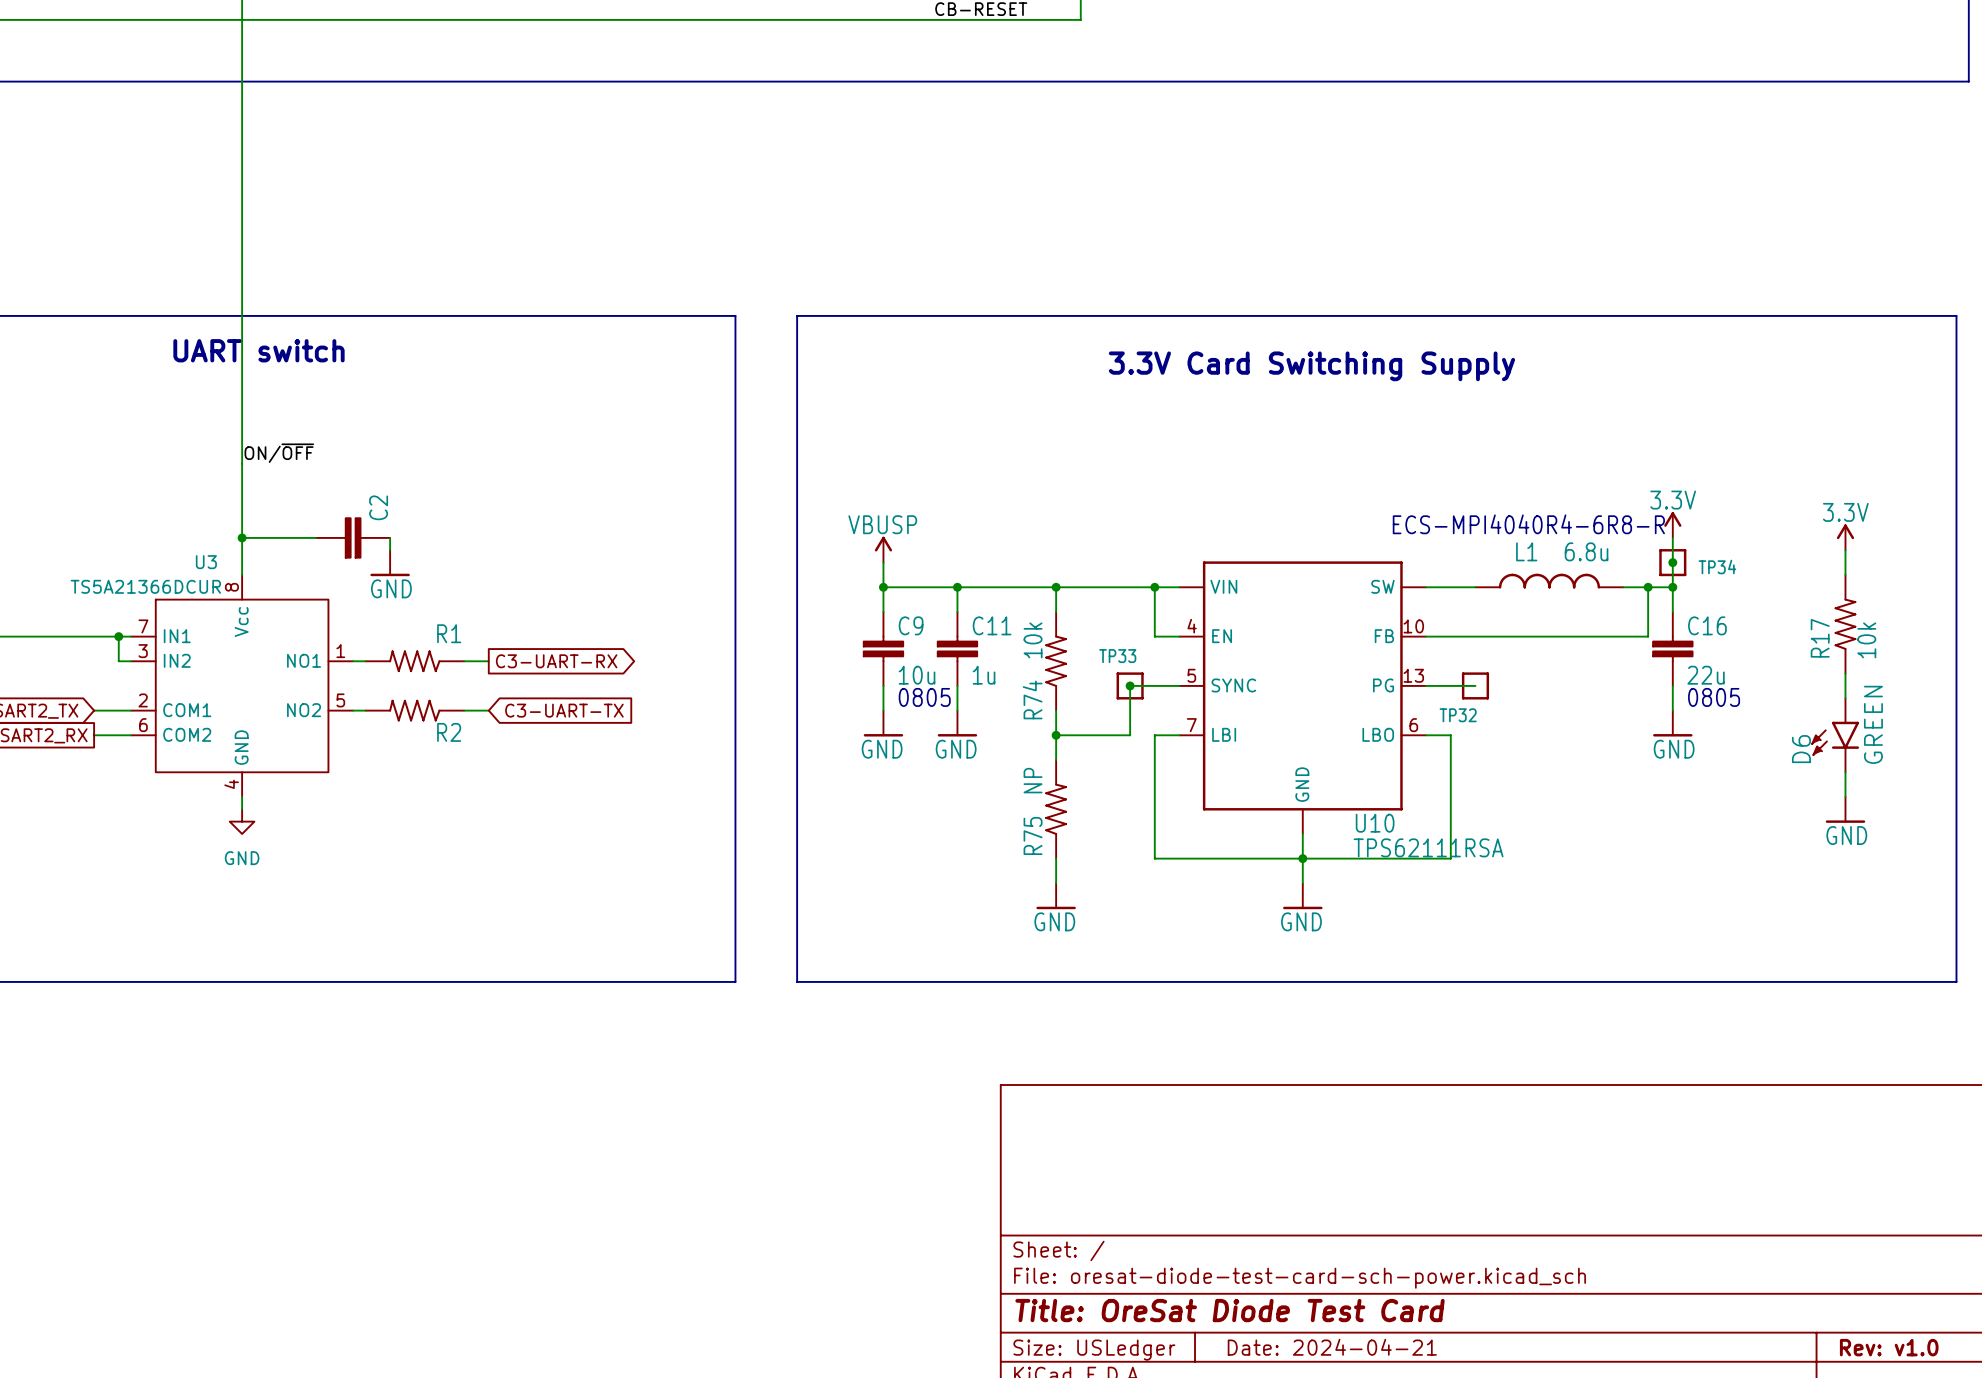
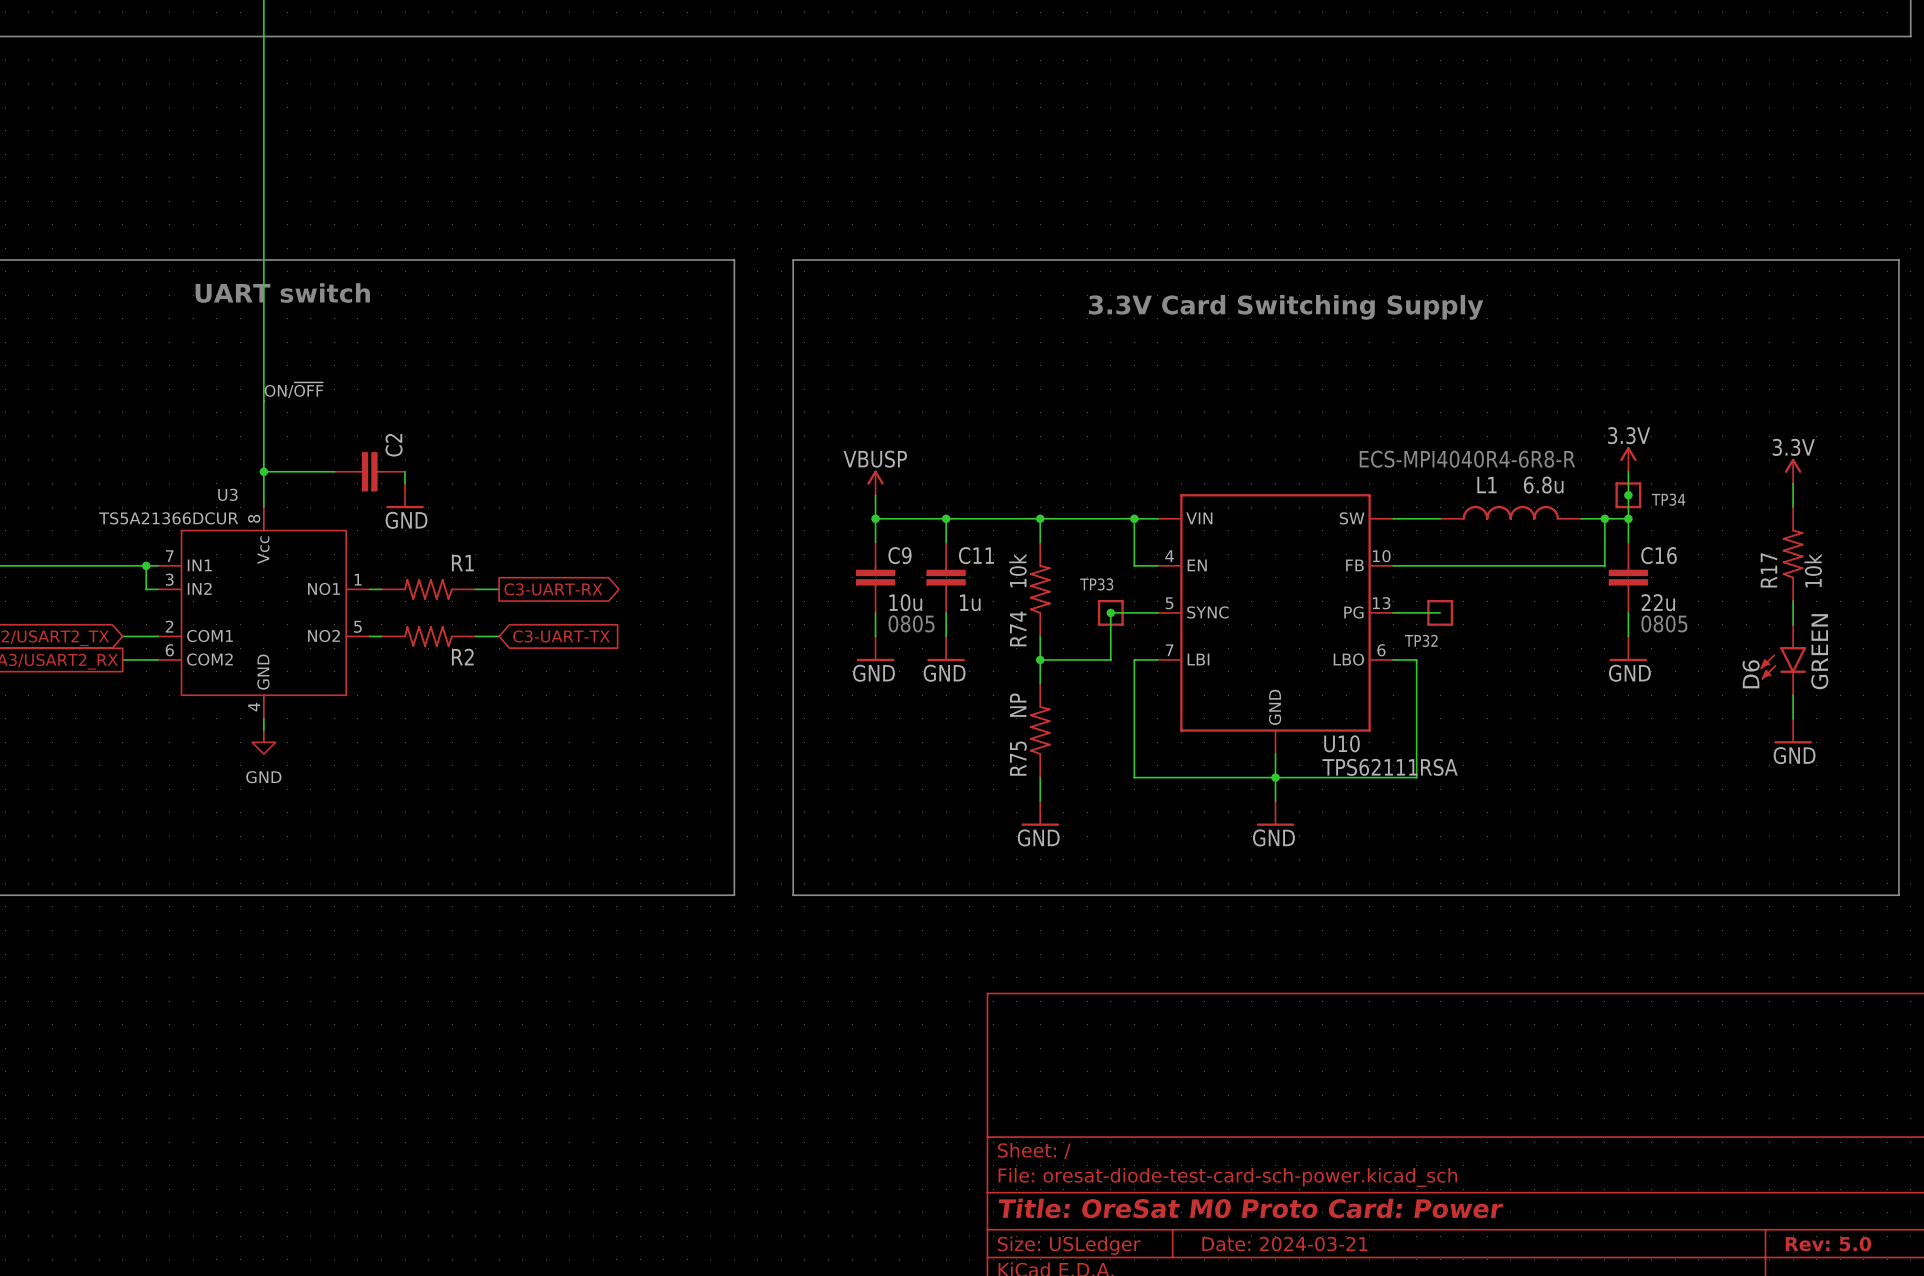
title block: Title: OreSat Diode Test Card (1230, 1310) -> Title: OreSat M0 Proto Card: Power (1250, 1208)
title block: Date: 2024-04-21 (1332, 1347) -> Date: 2024-03-21 (1284, 1244)
title block: Rev: v1.0 (1889, 1347) -> Rev: 5.0 (1828, 1244)

